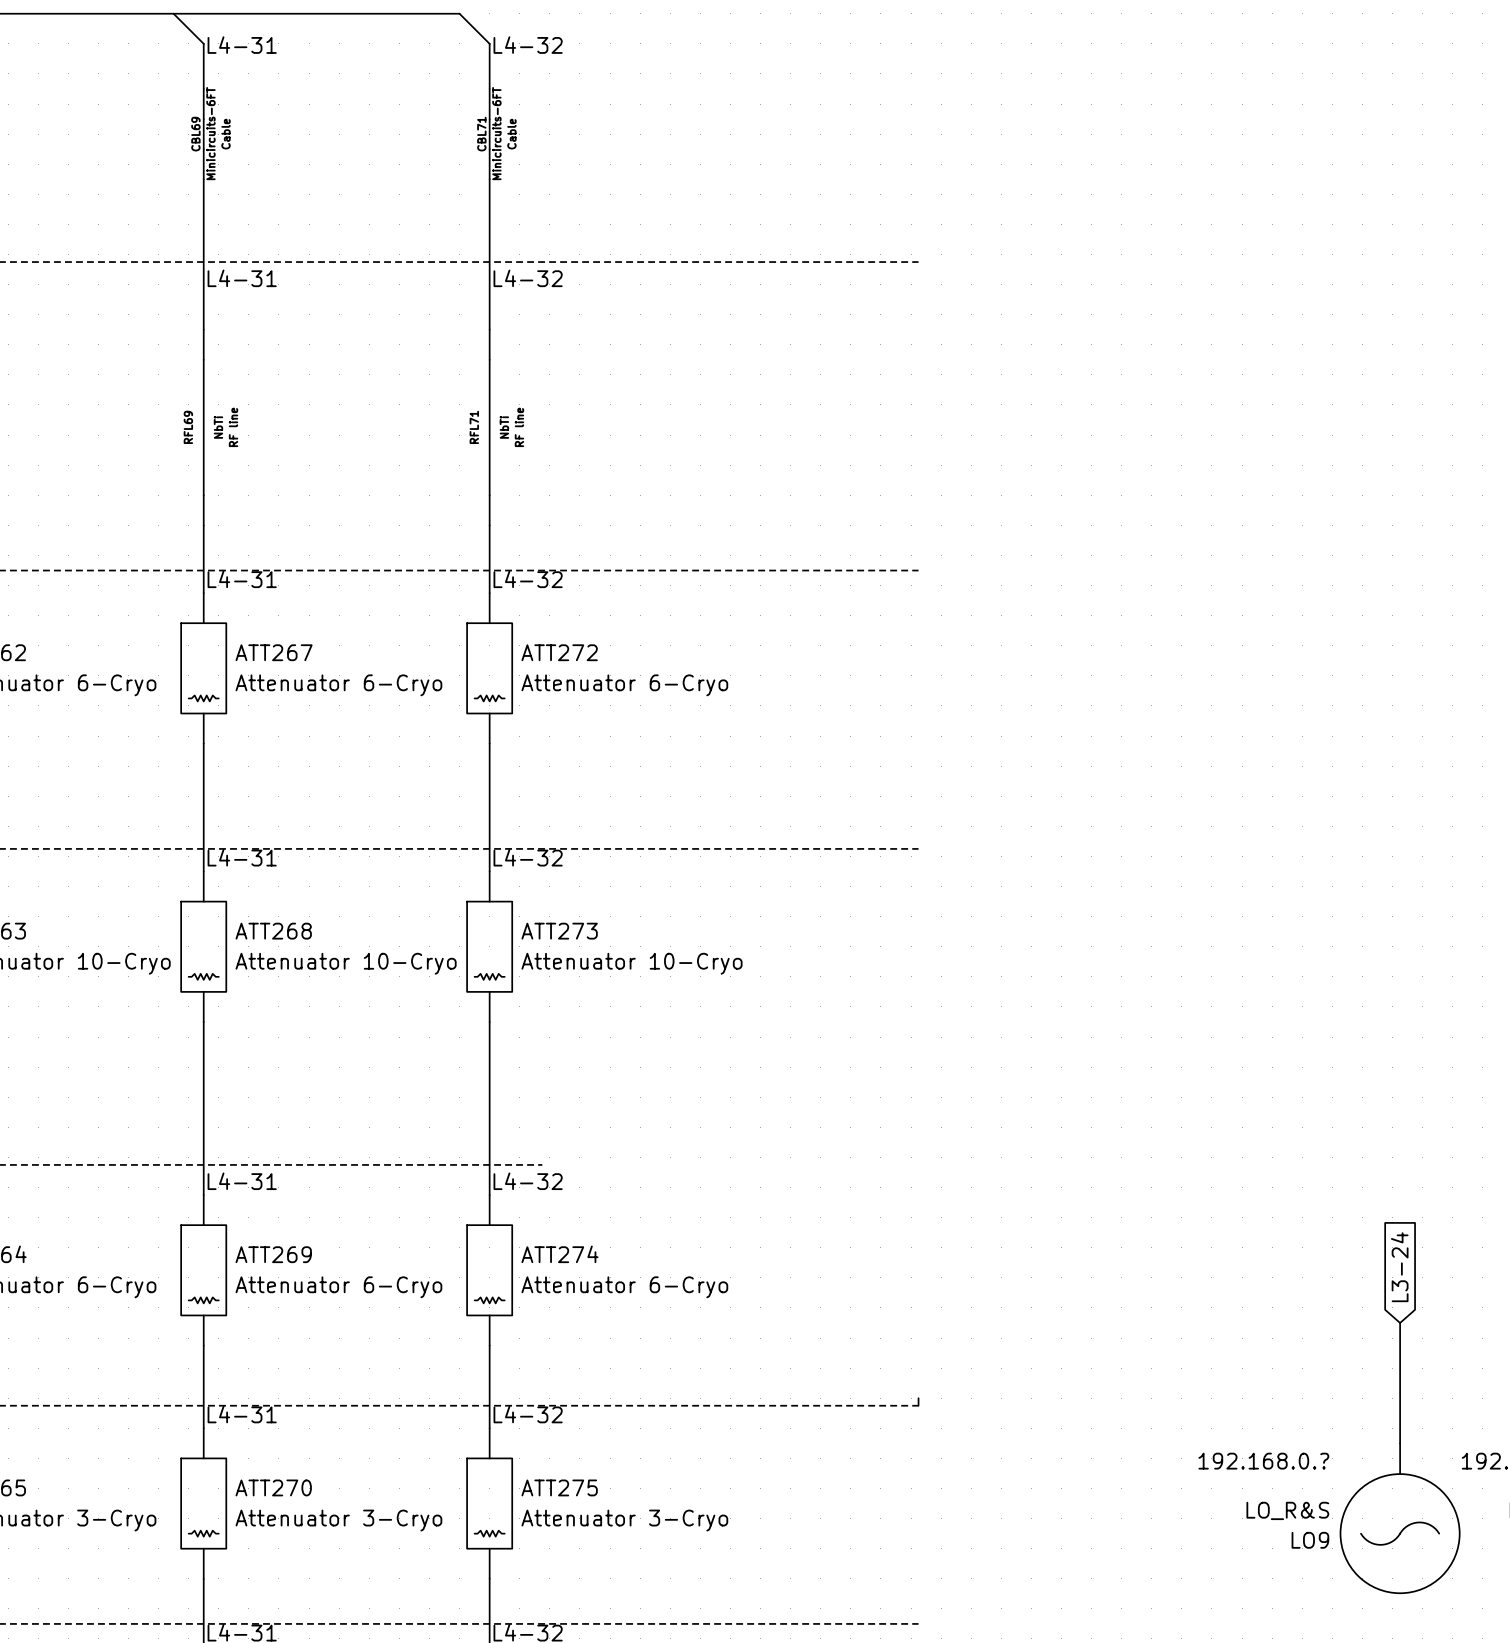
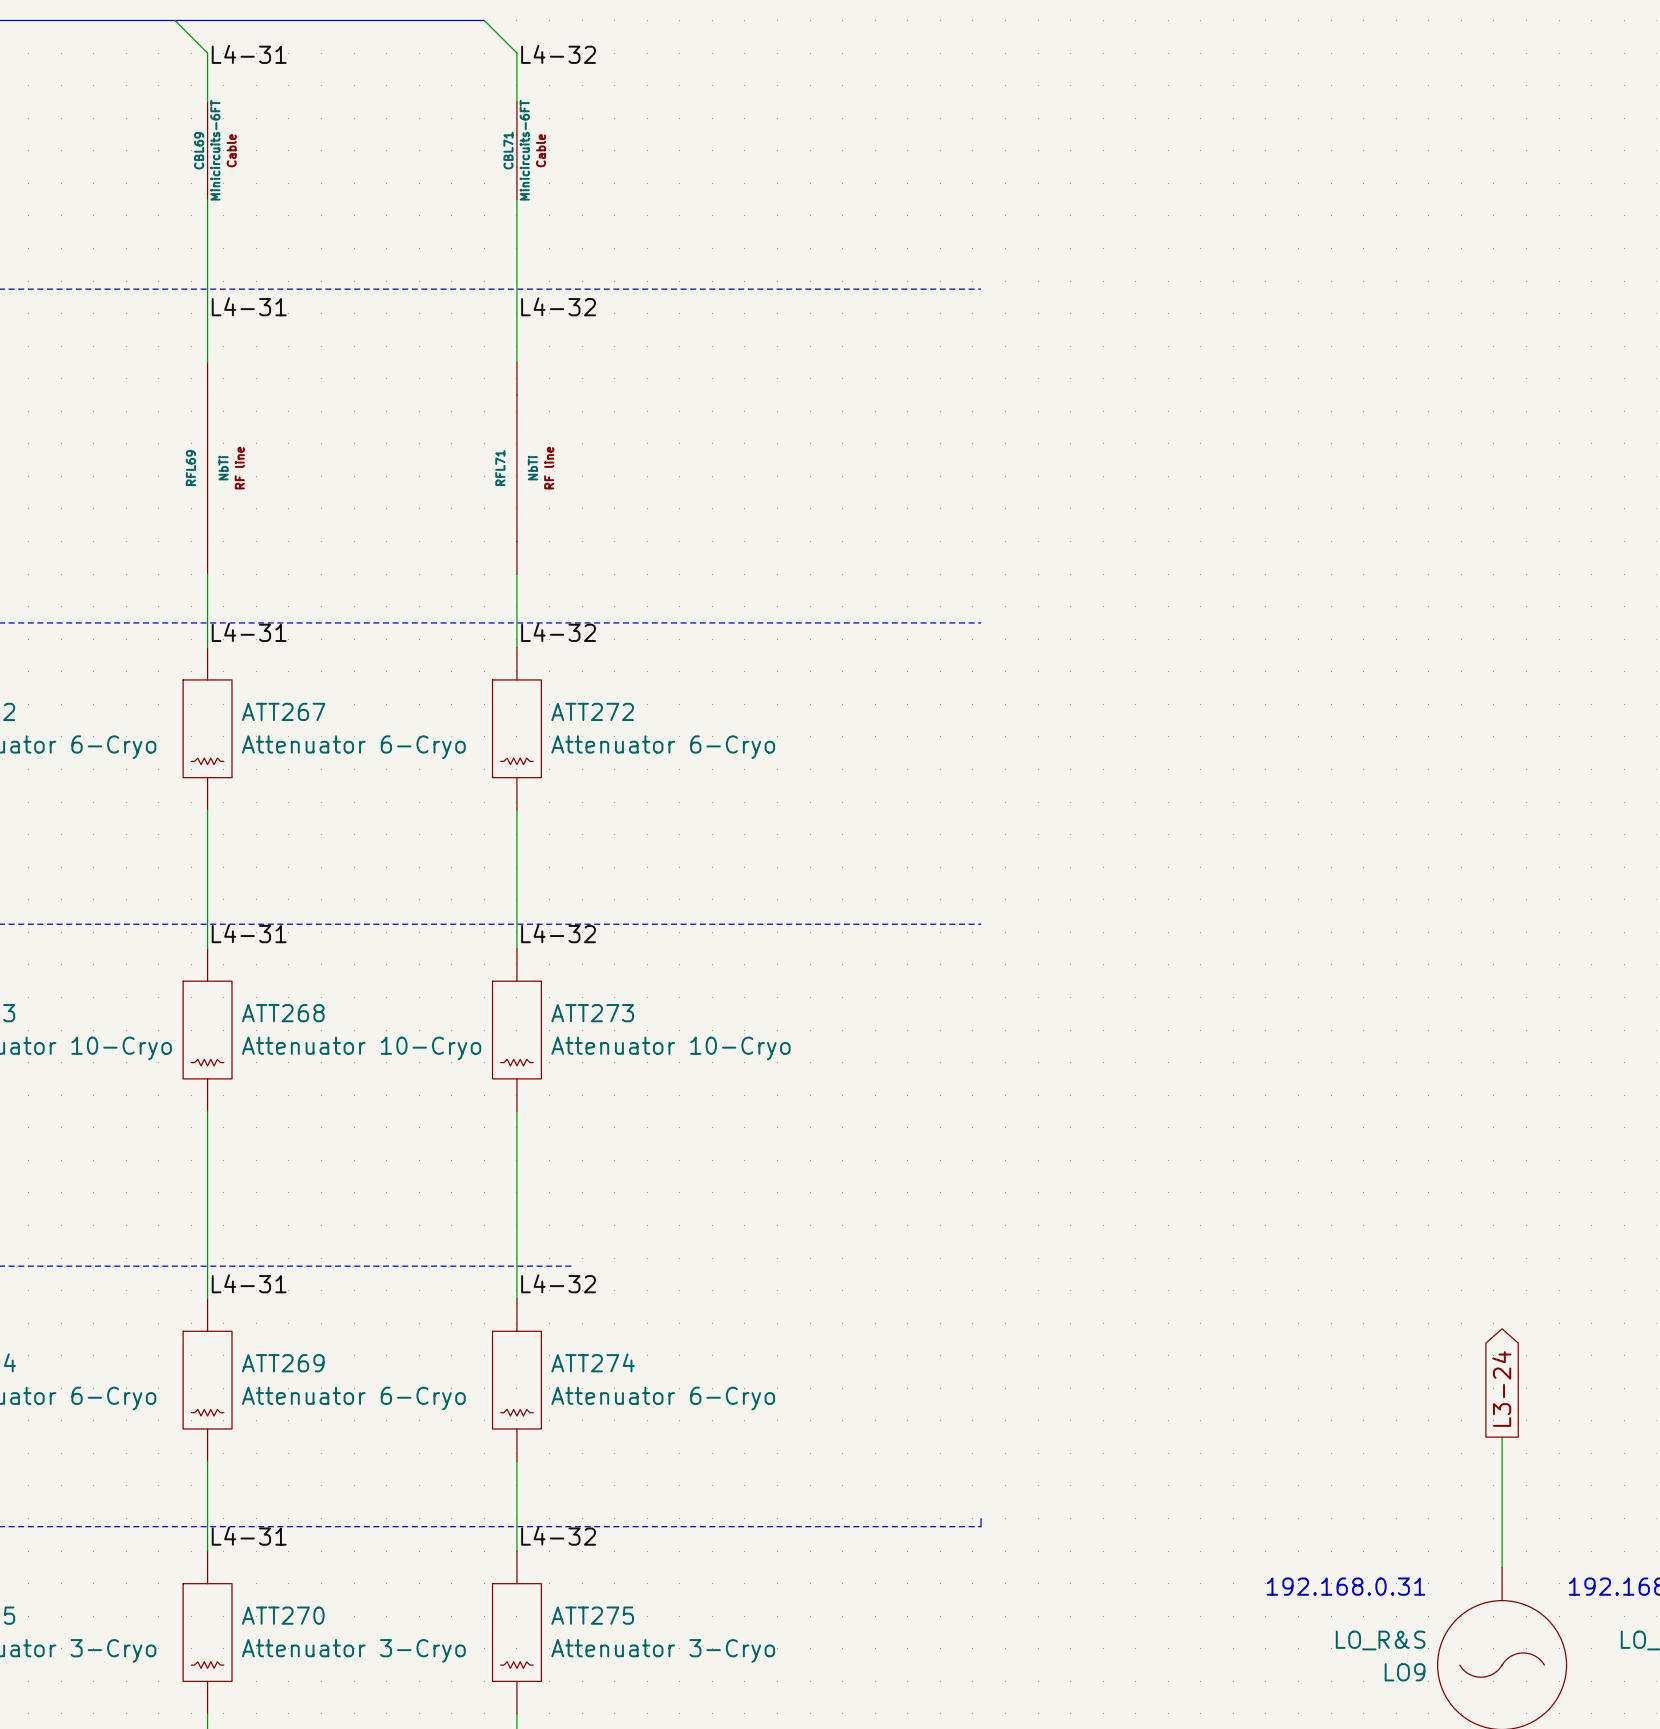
global label shape: input (1399, 1267) -> output (1501, 1389)
text: 192.168.0.? (1263, 1461) -> 192.168.0.31 (1346, 1586)

